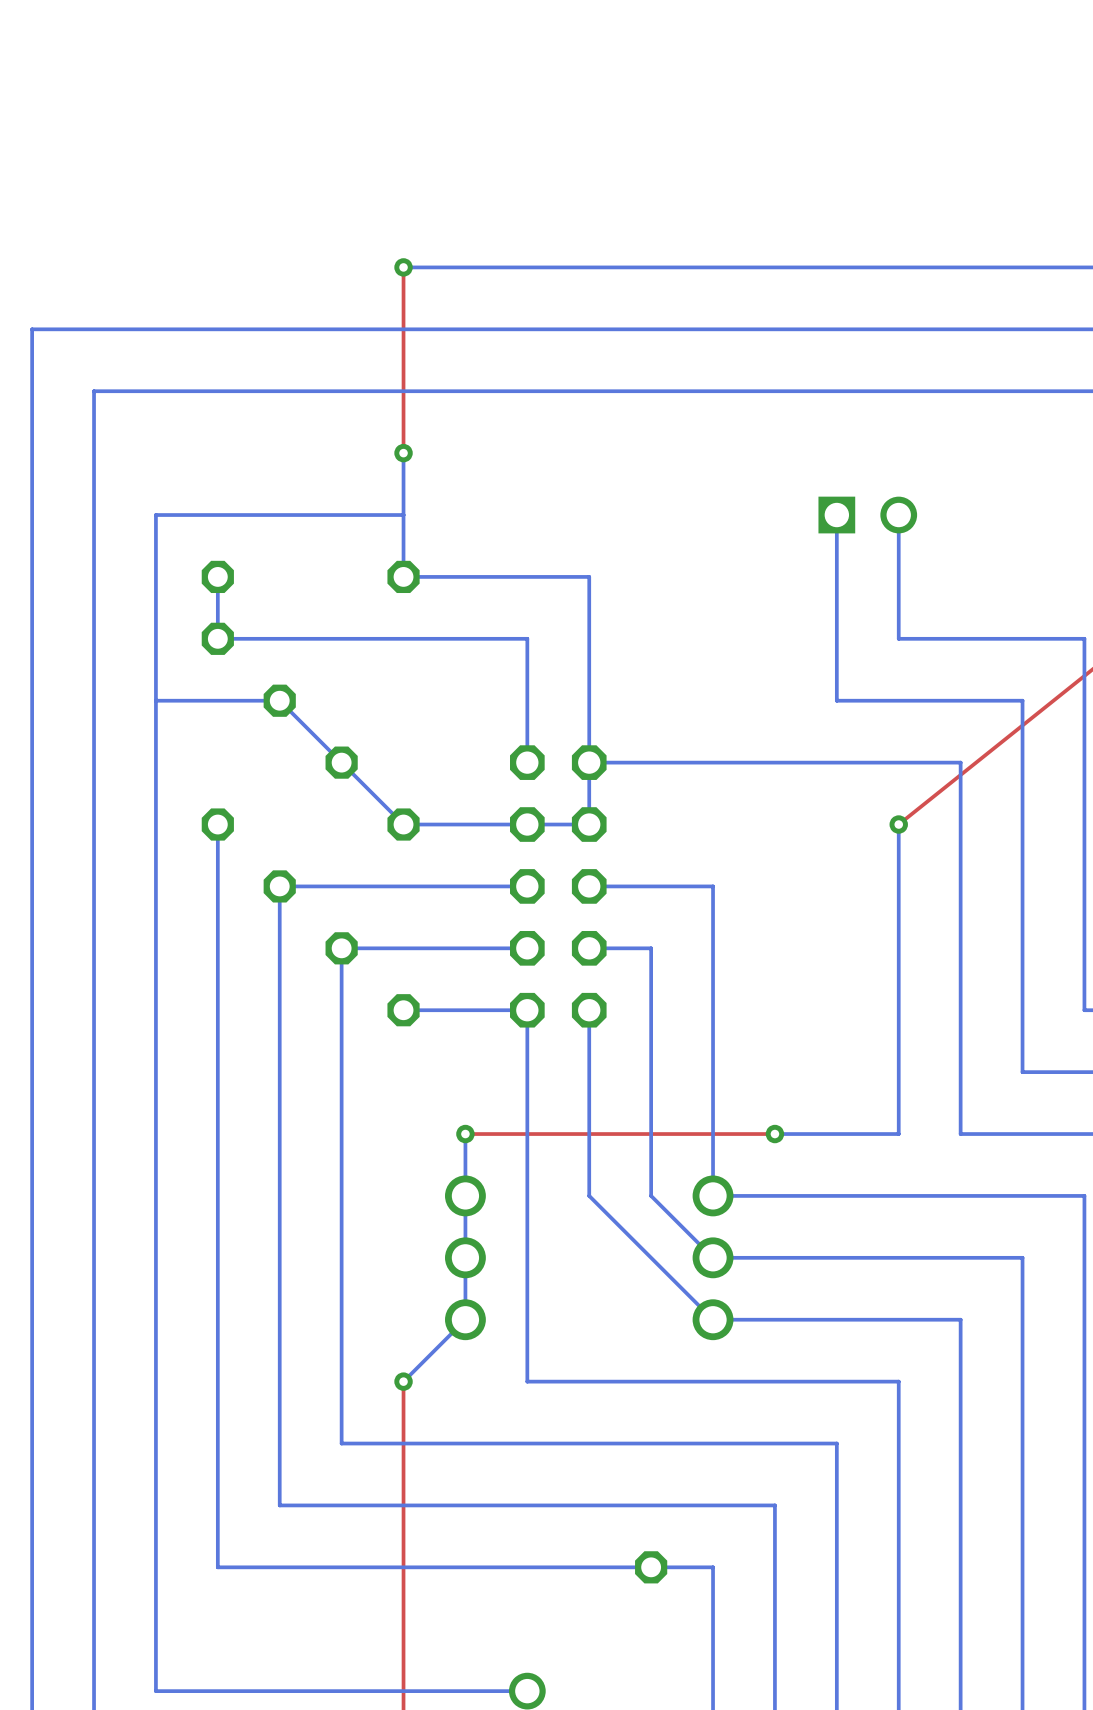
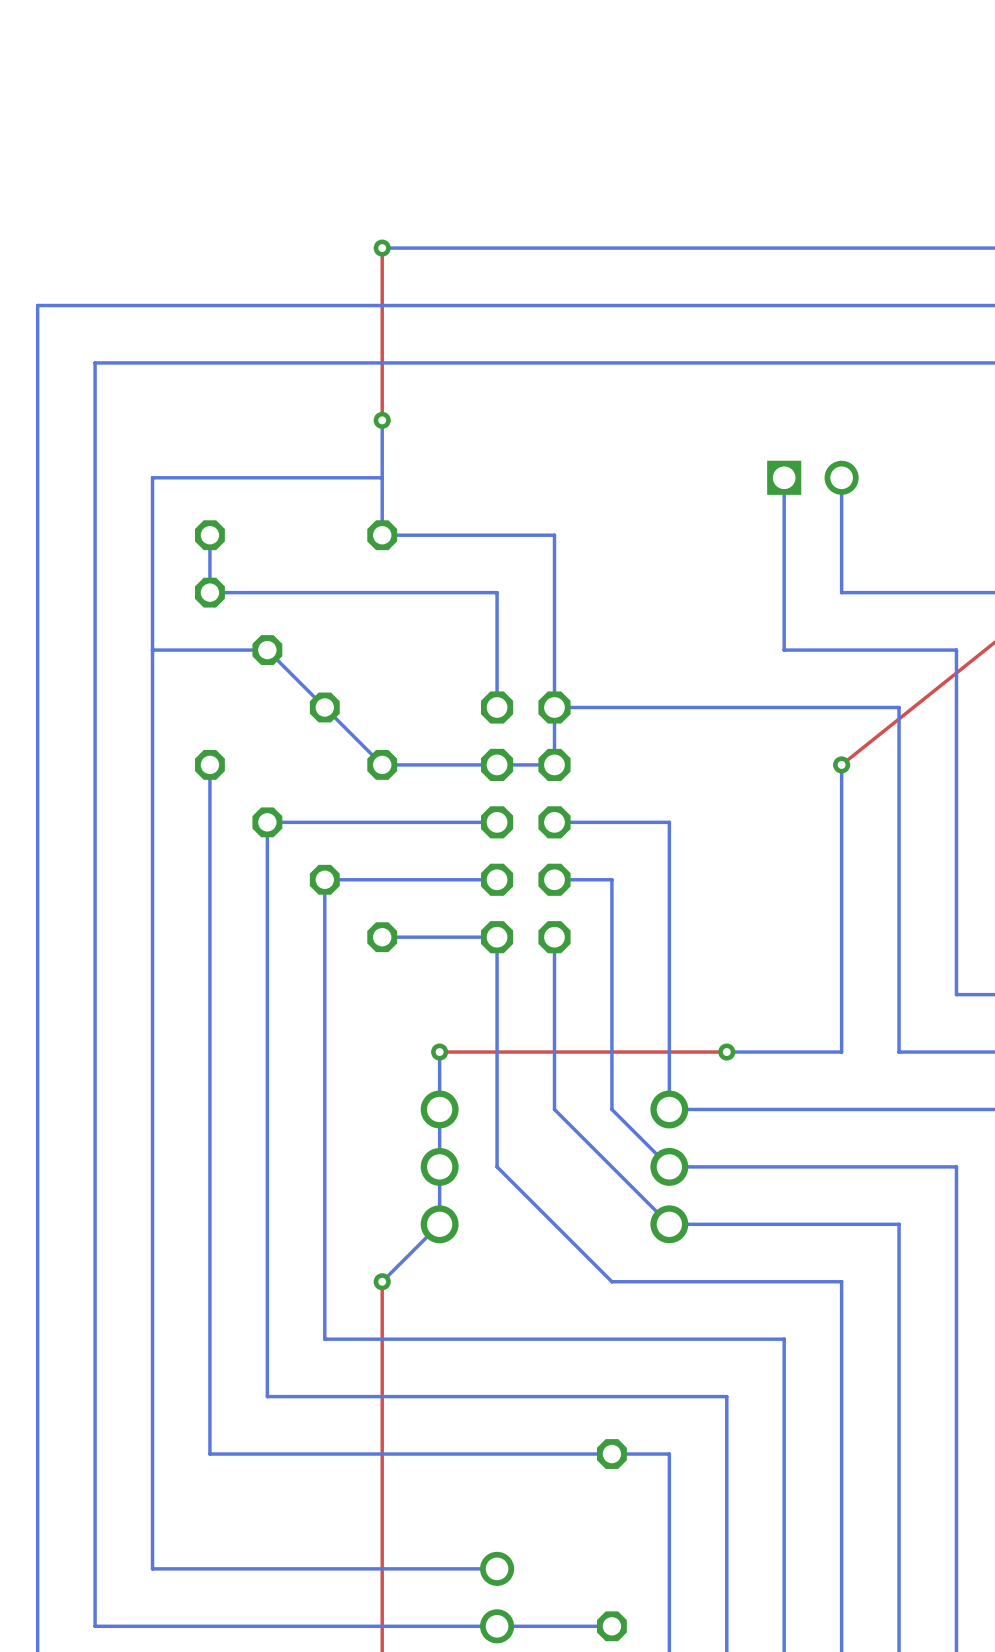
bottom track: (527, 1257) (527, 1381) (651, 1381) -> (497, 1166) (611, 1281)

